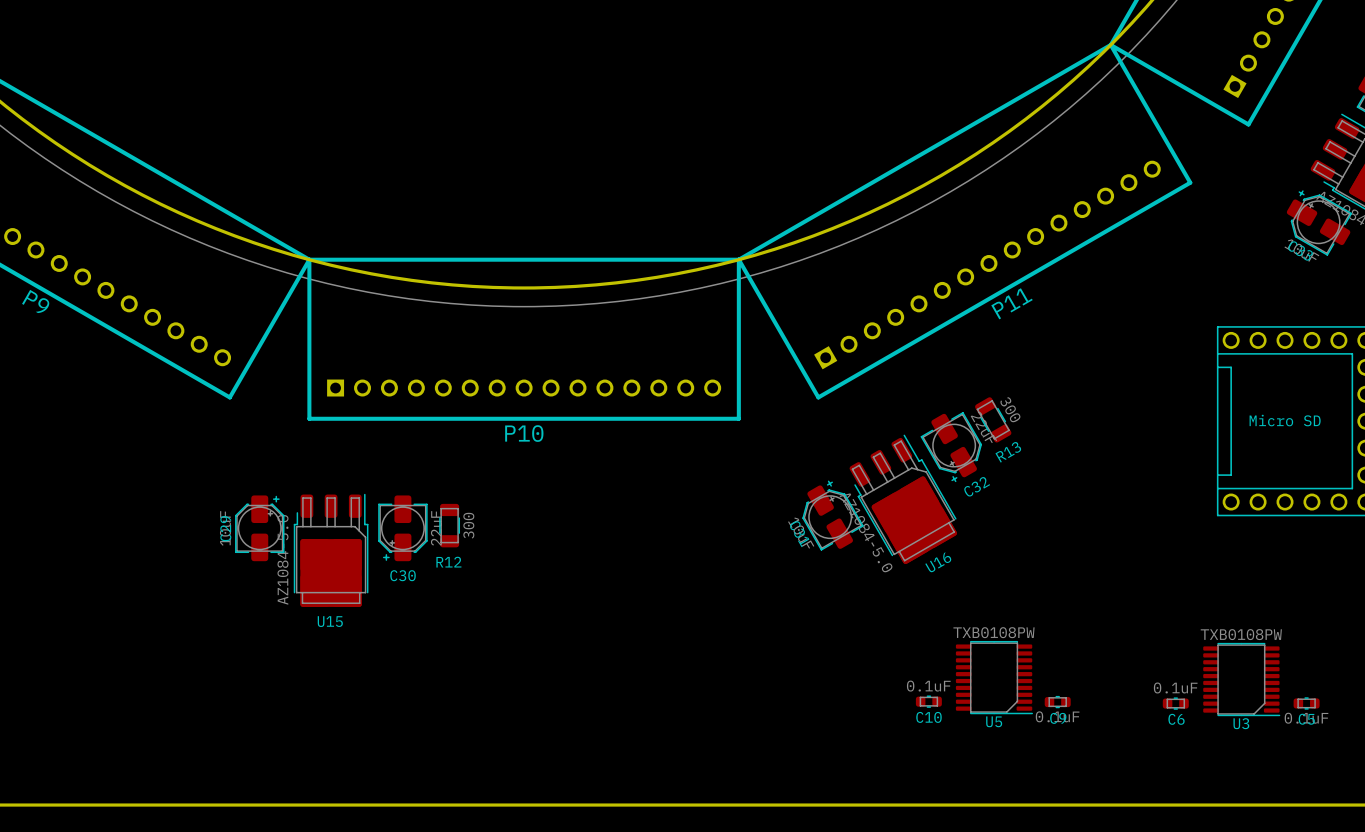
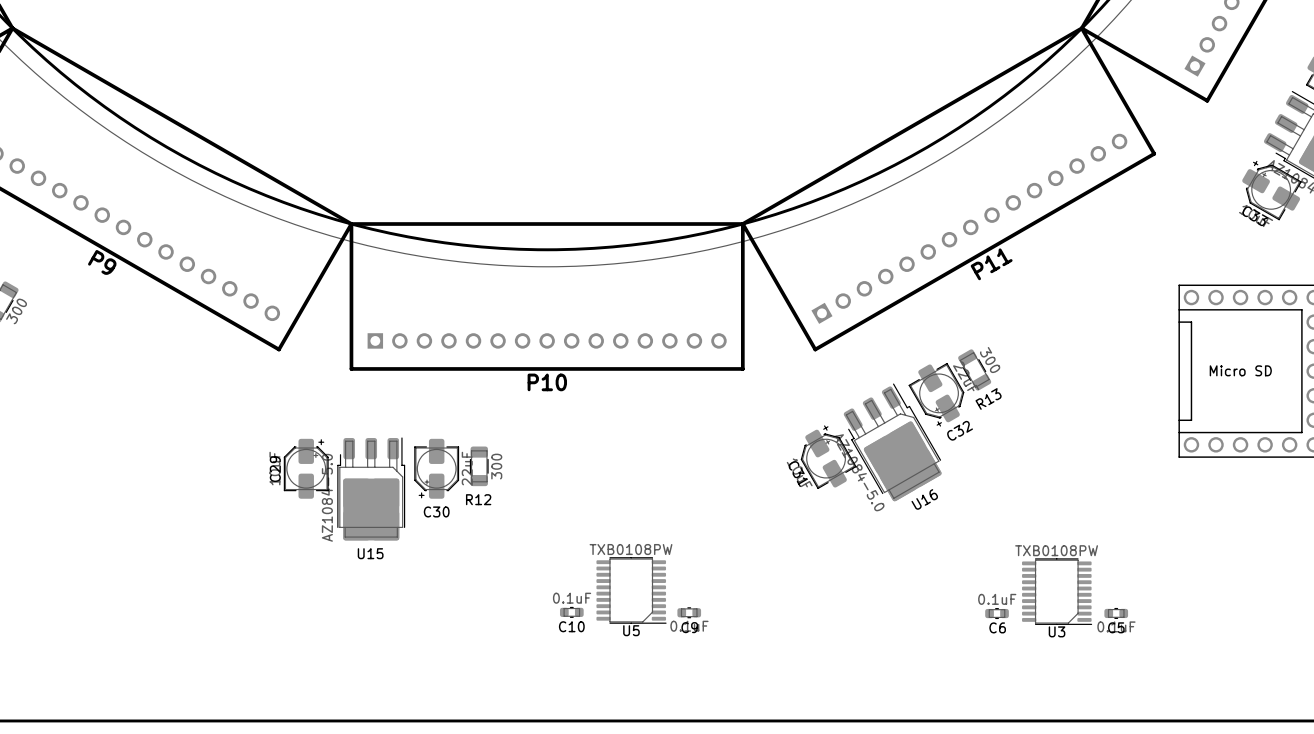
U5 position: (994, 677) -> (631, 590)
U3 position: (1241, 679) -> (1057, 591)
C10 position: (928, 701) -> (571, 612)
C9 position: (1057, 702) -> (689, 612)
C6 position: (1175, 703) -> (997, 613)
C5 position: (1306, 703) -> (1116, 613)

